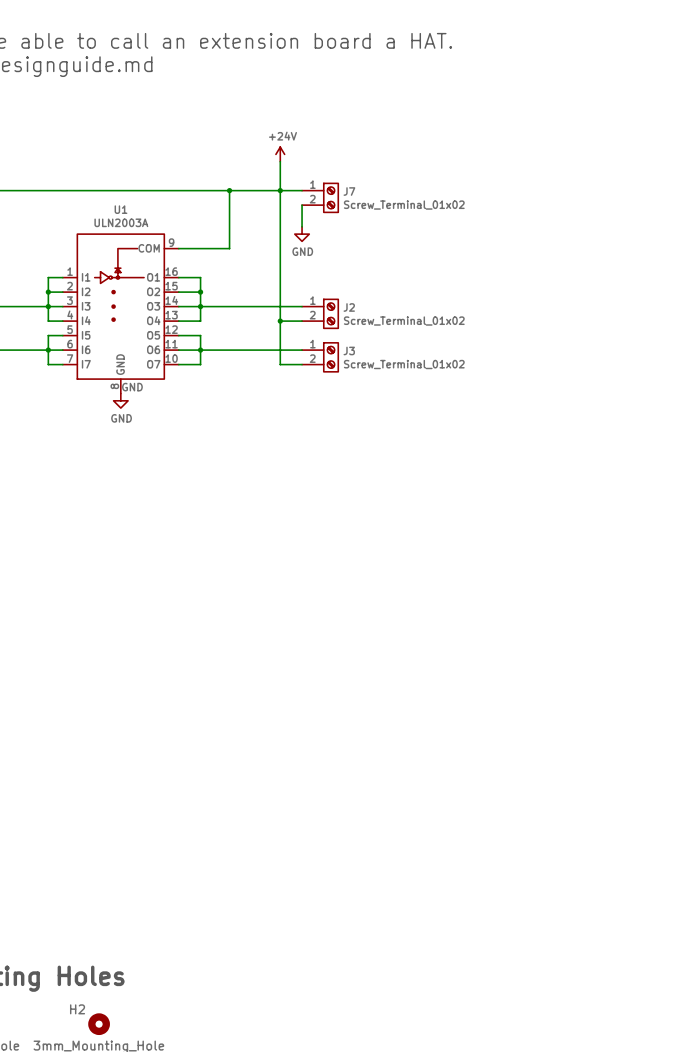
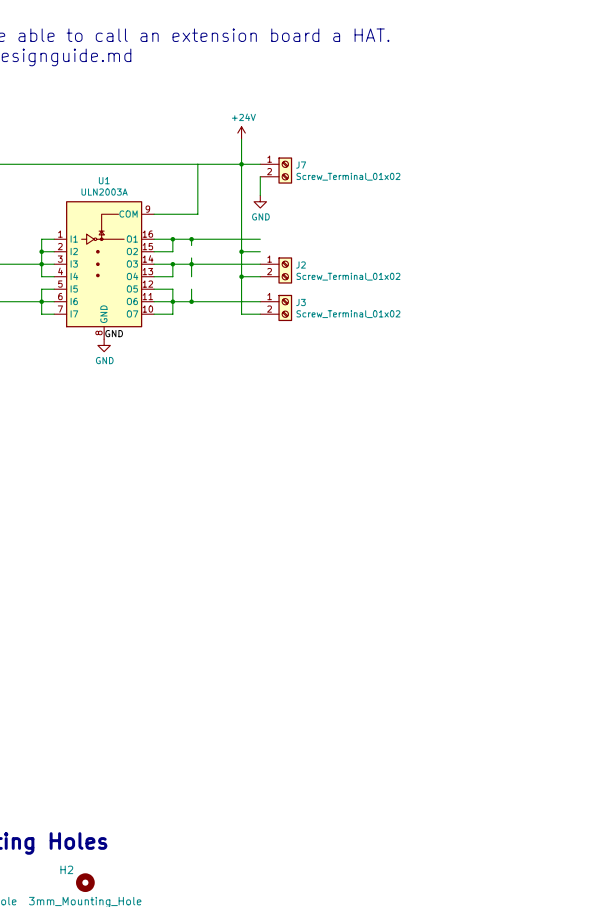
junction: (229, 190) -> none
wire: none -> (172, 239) (260, 239)
junction: none -> (172, 239)
wire: none -> (191, 239) (191, 245)
junction: none -> (191, 239)
wire: (200, 292) (200, 306) -> (191, 289) (191, 301)
junction: (200, 292) -> none
wire: none -> (241, 251) (260, 251)
junction: none -> (241, 251)
wire: none -> (191, 257) (191, 276)
junction: none -> (191, 264)
junction: none -> (191, 301)

